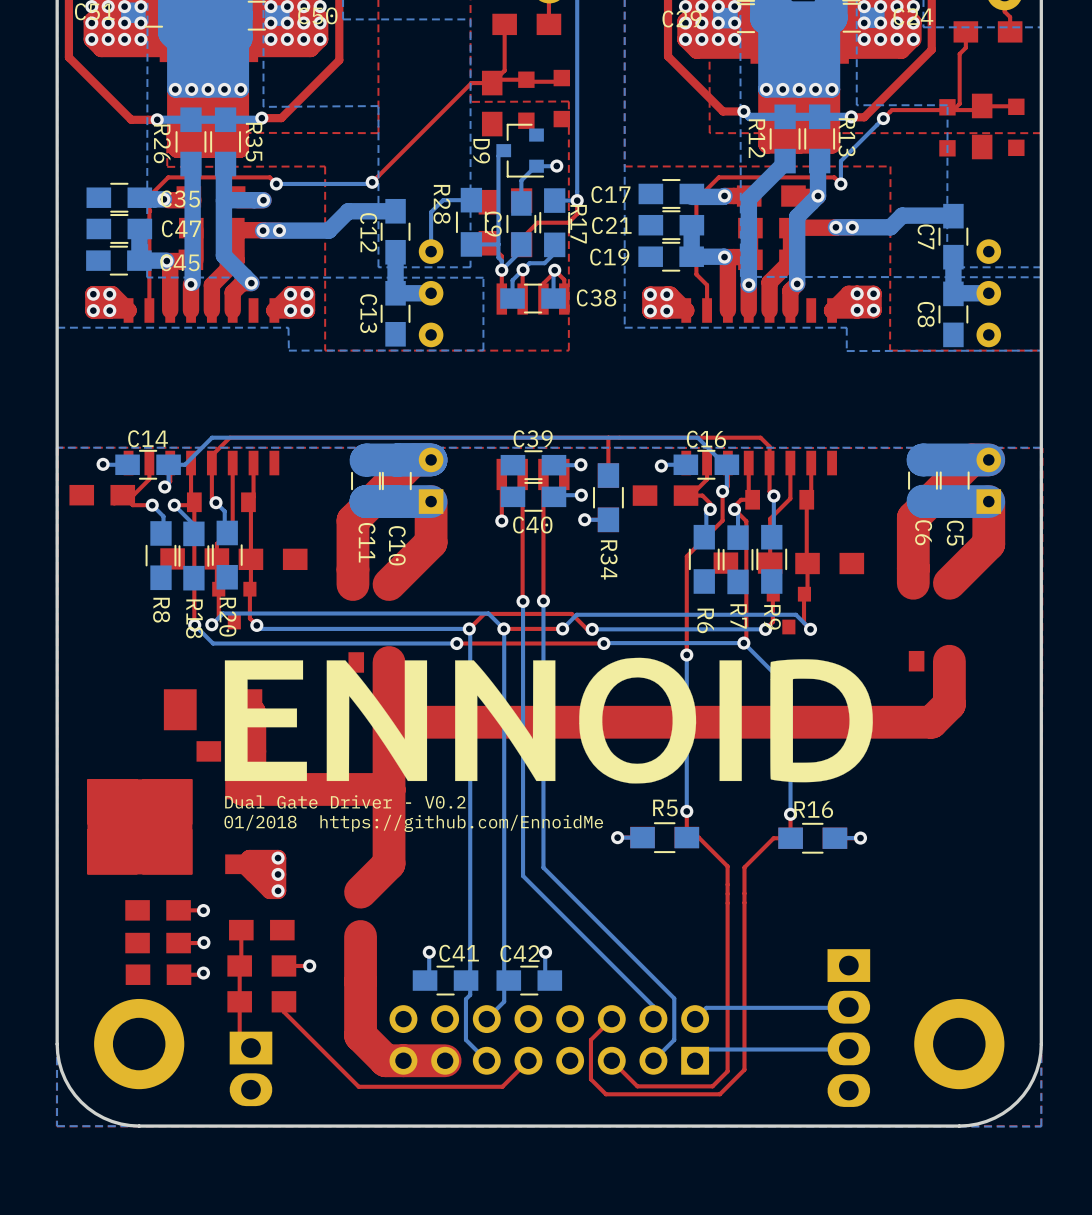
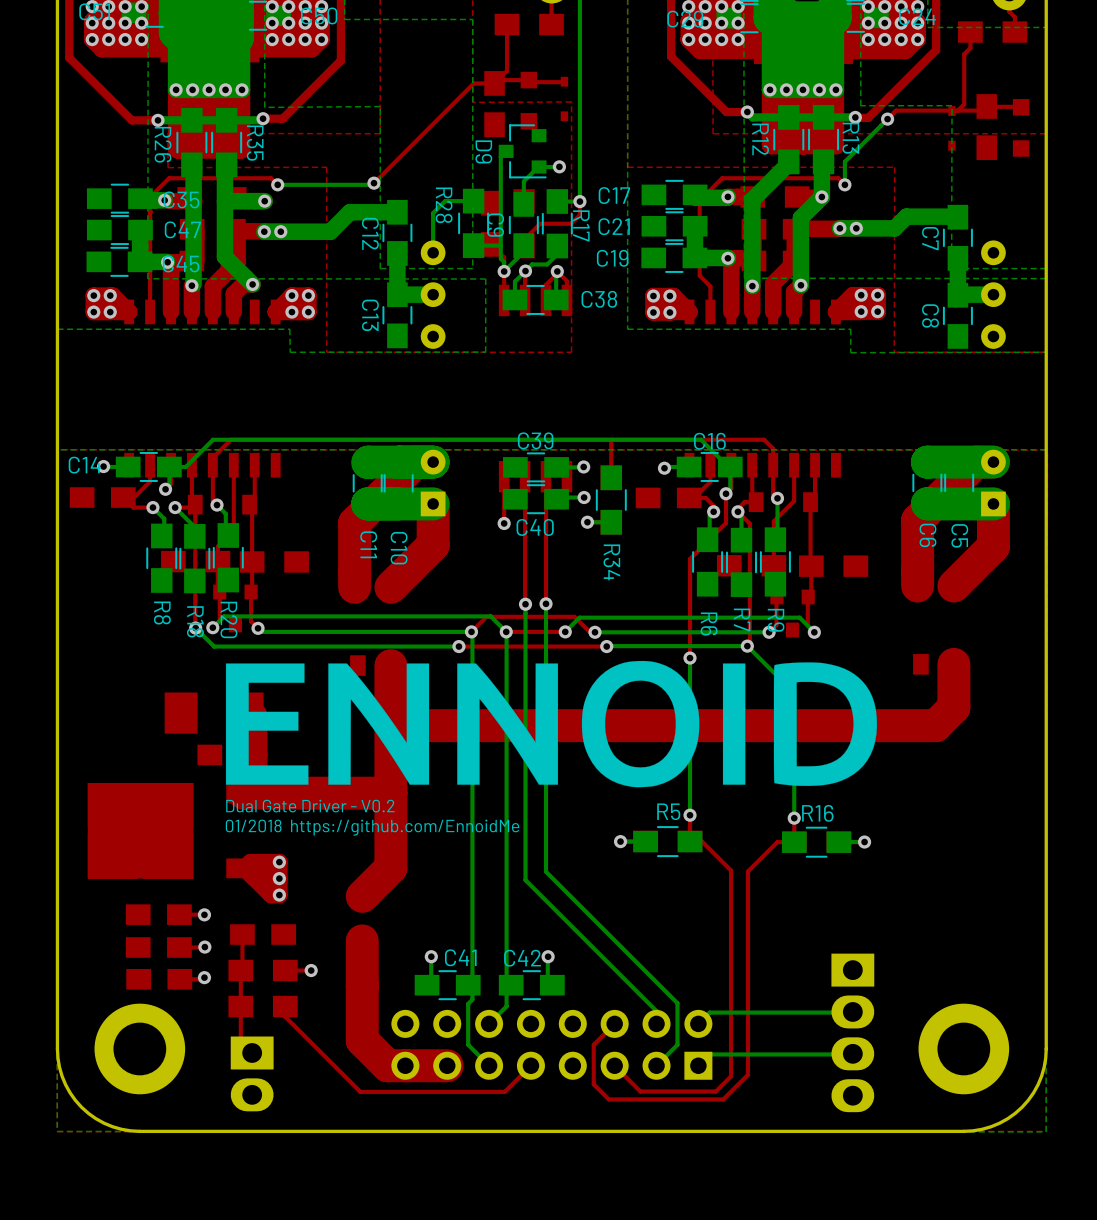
part footprint: [553, 69, 570, 128] -> [560, 76, 569, 122]
part footprint: [939, 99, 956, 157] -> [948, 106, 956, 151]
C14 name position: C14 (148, 438) -> C14 (84, 465)

